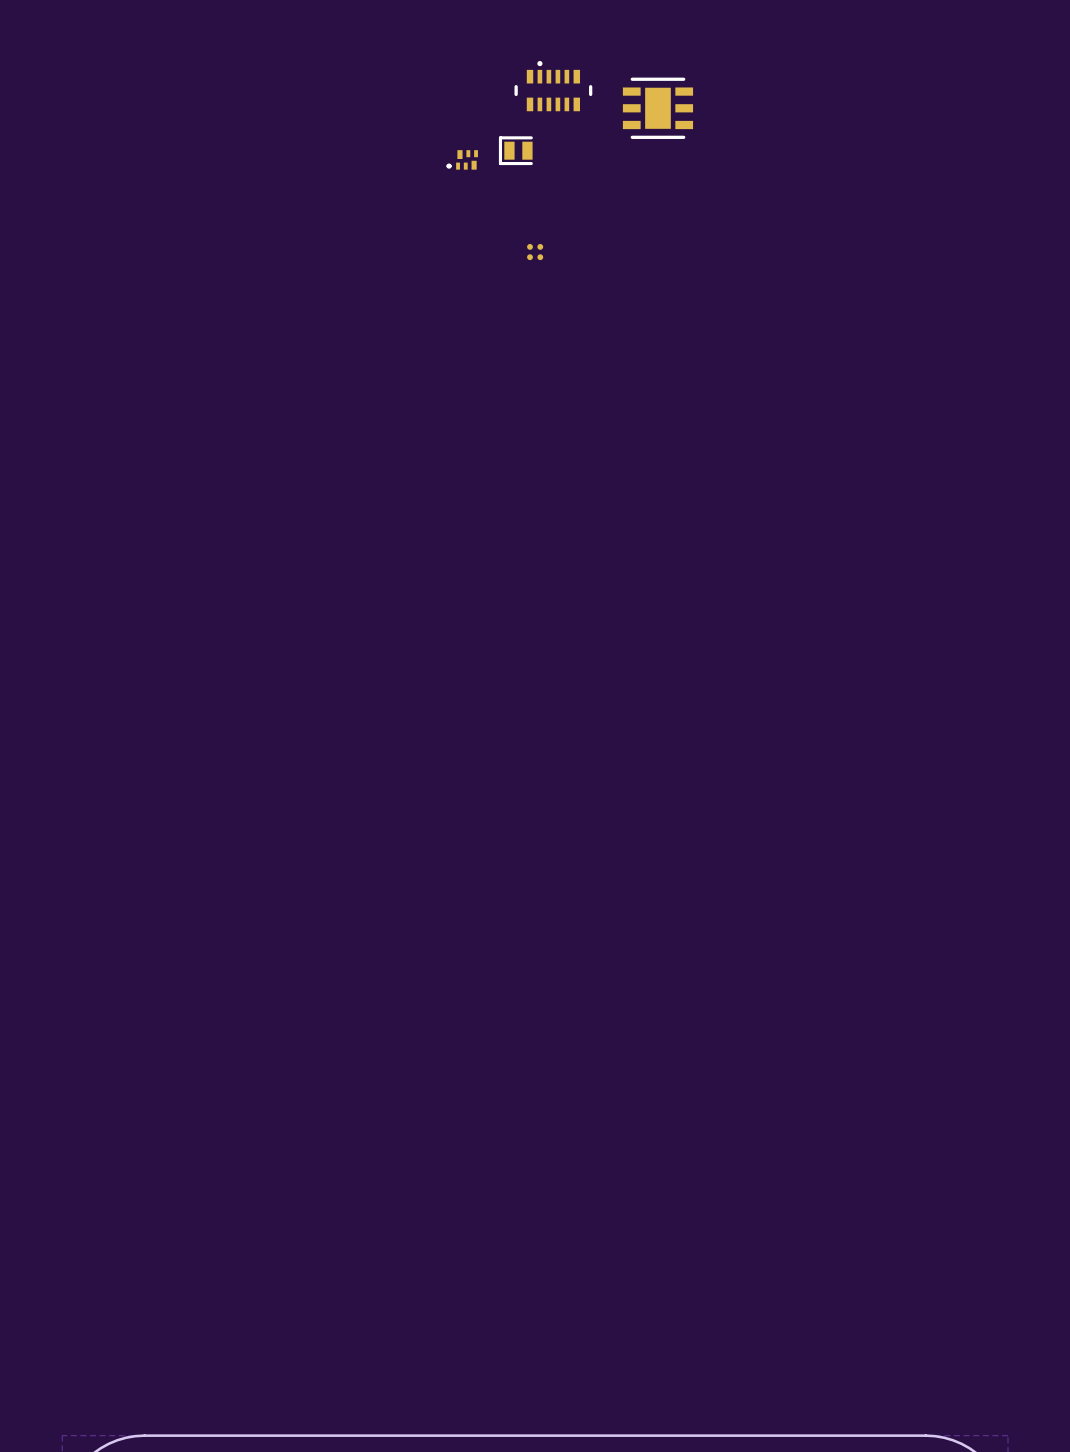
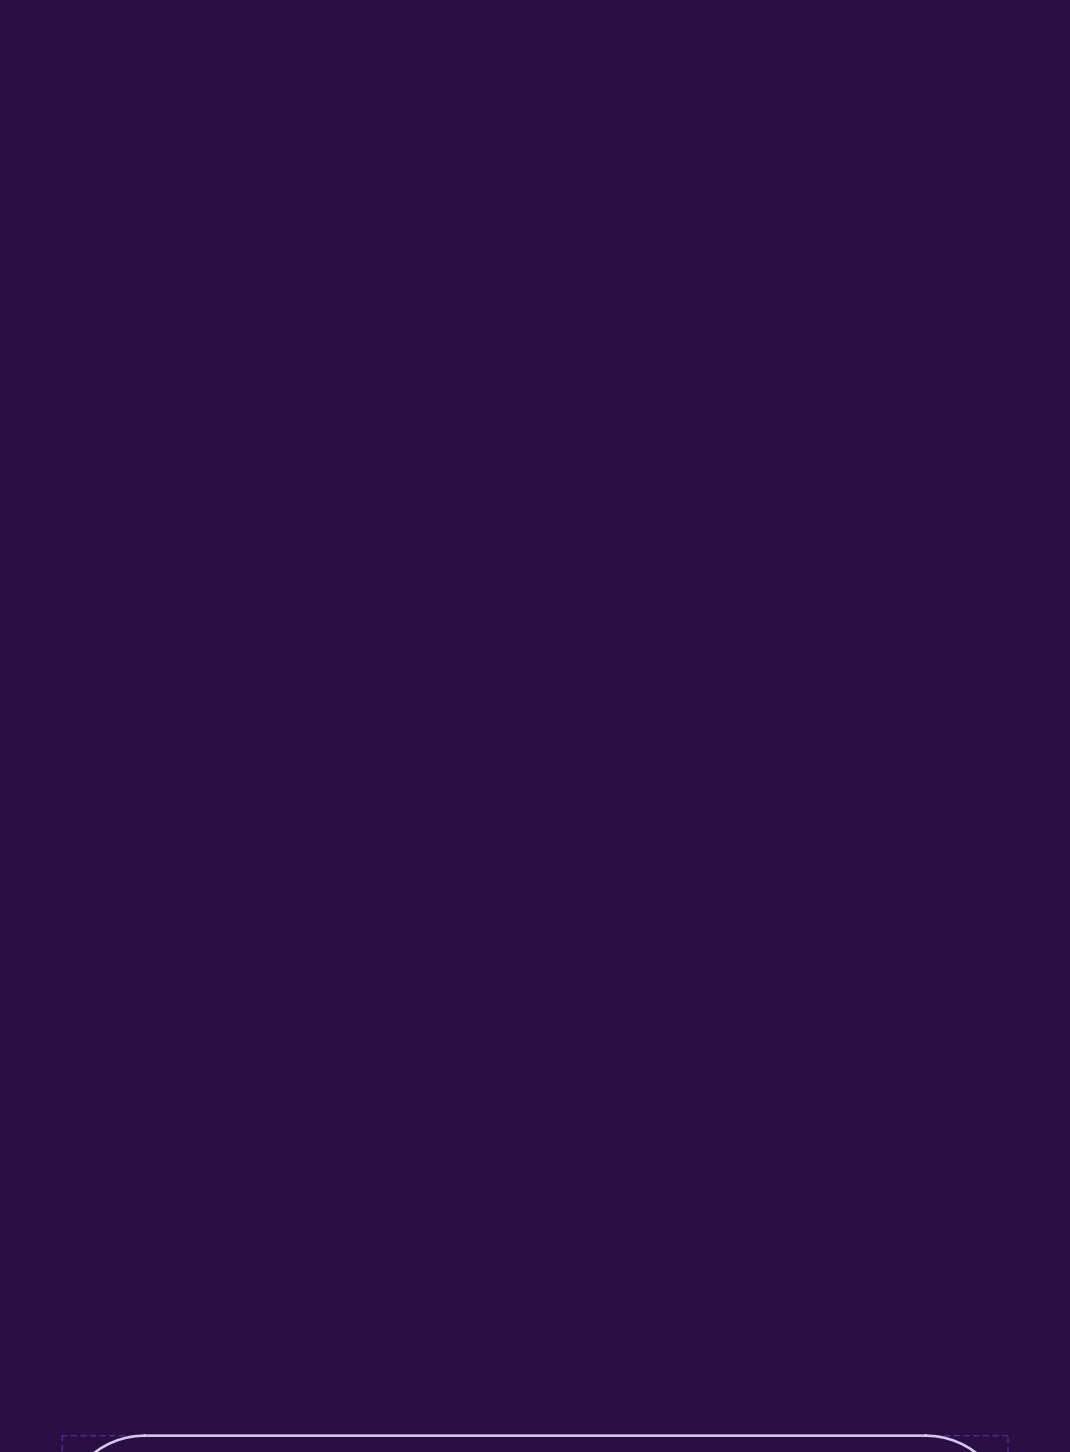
part: (553, 86) -> none
part: (657, 108) -> none
part: (515, 150) -> none
part: (462, 159) -> none
part: (535, 252) -> none

